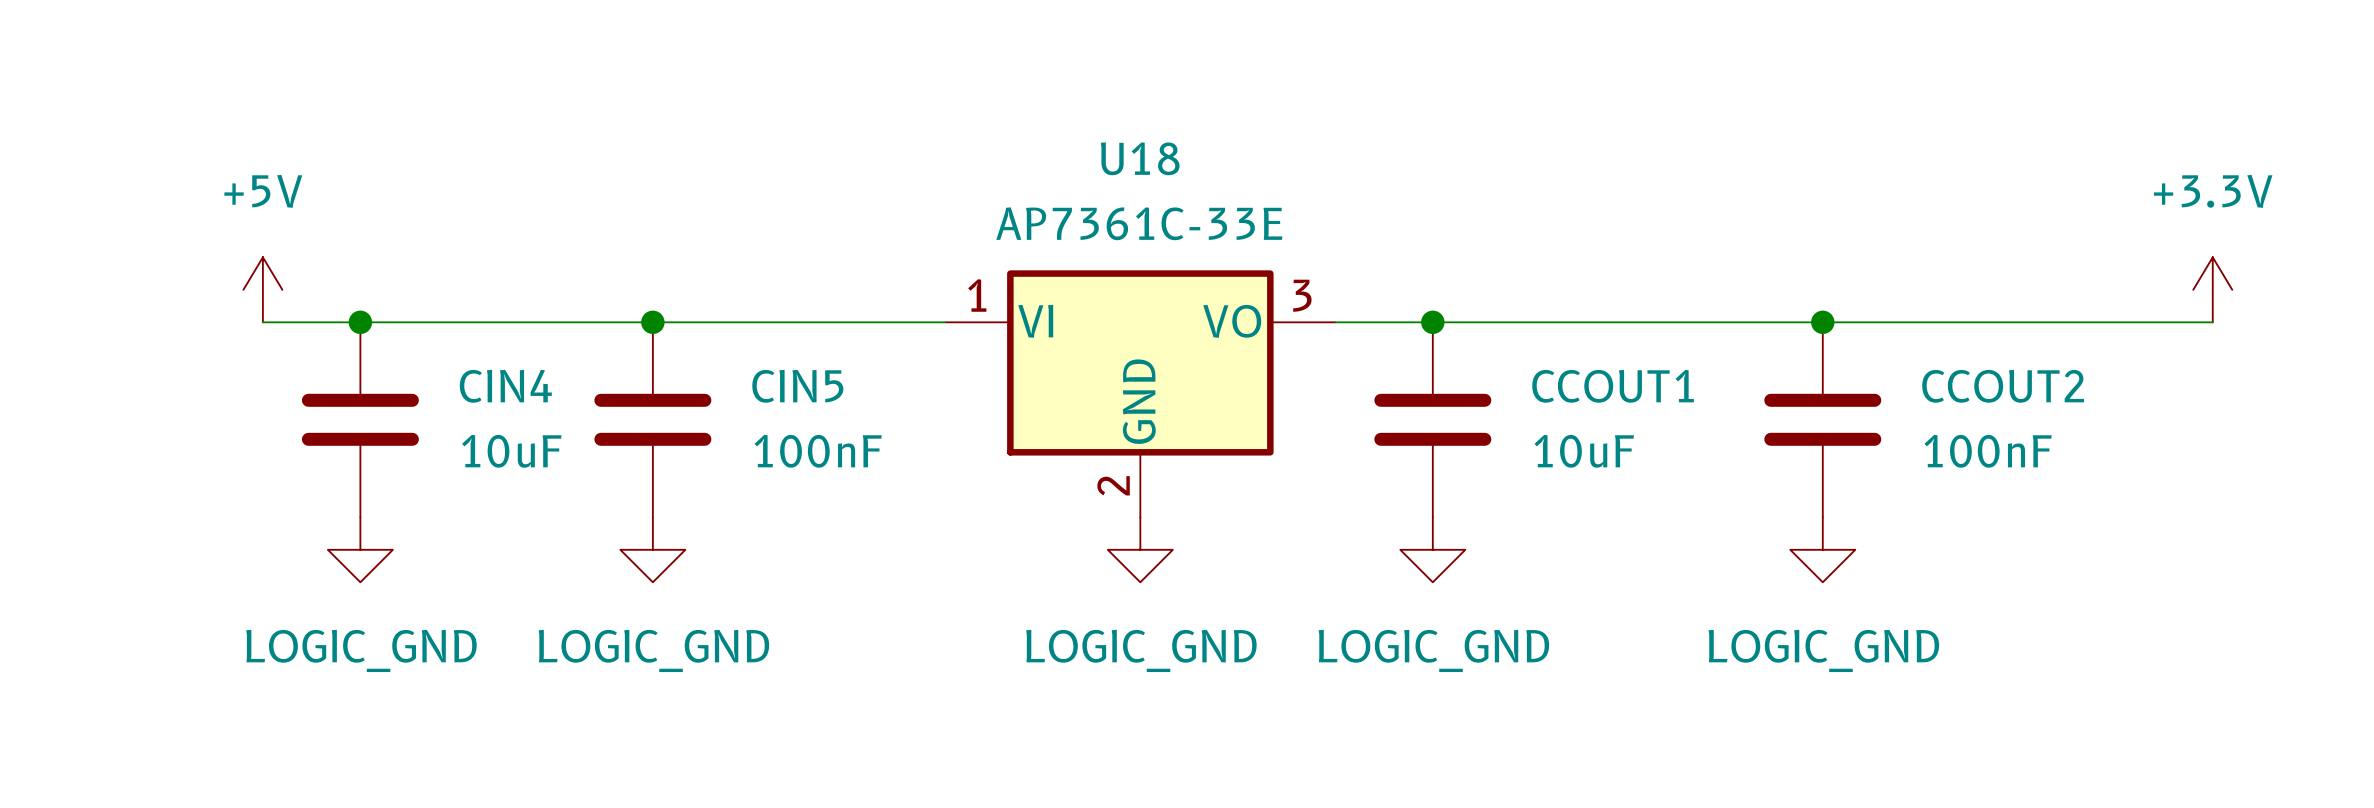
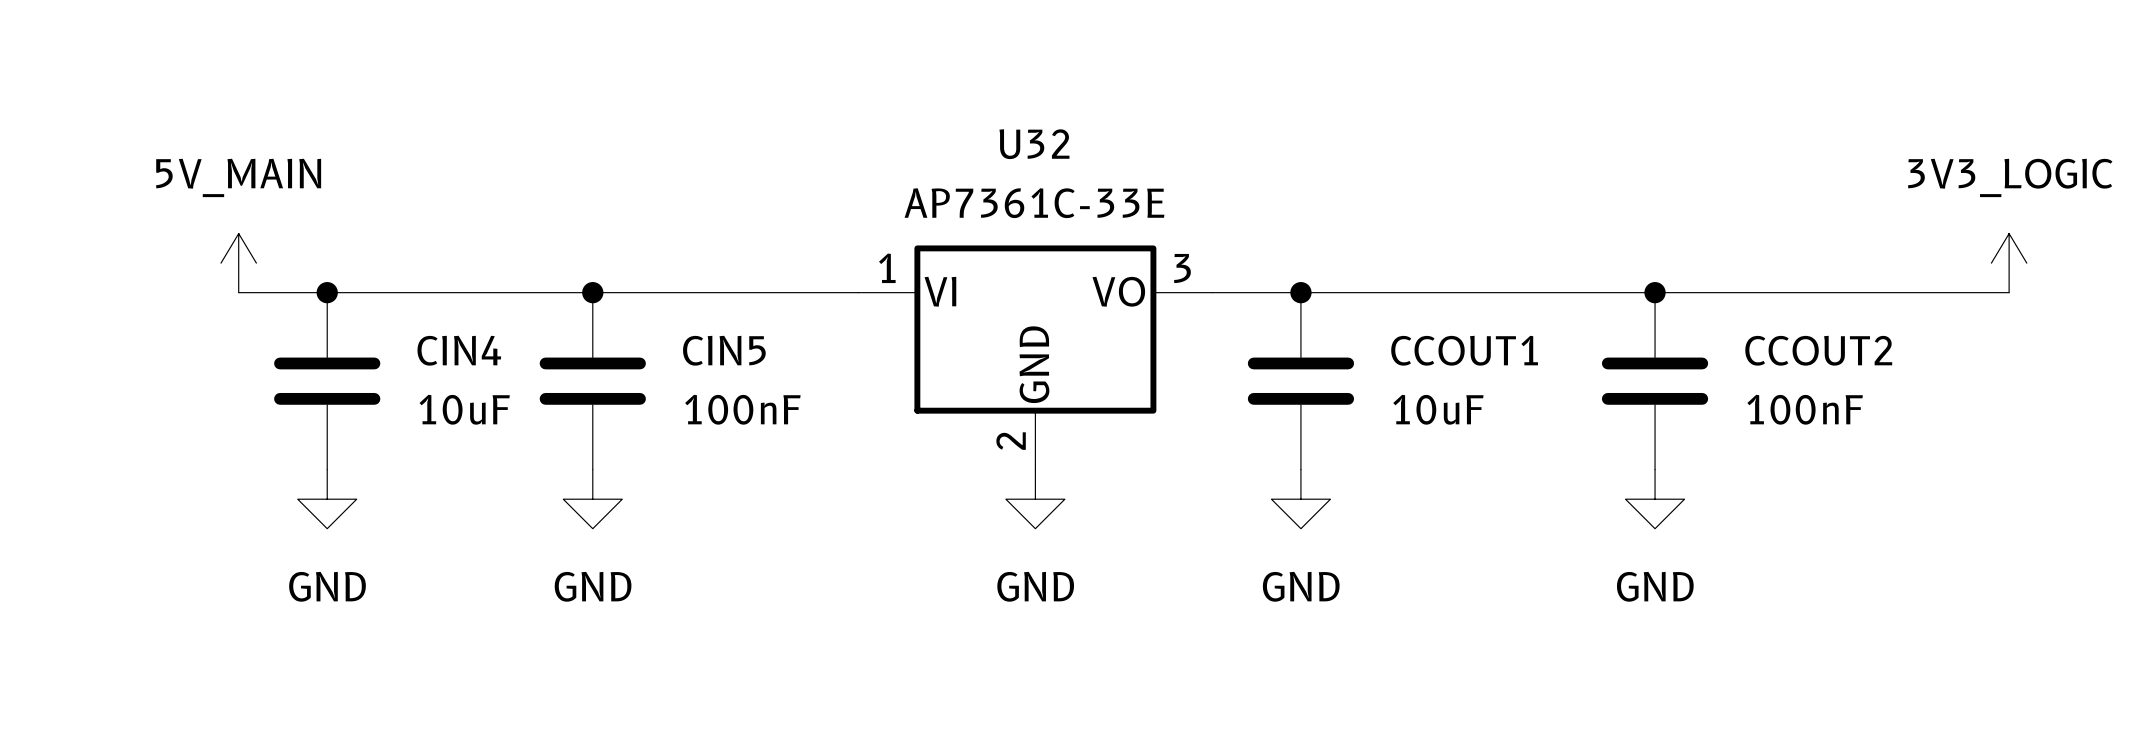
U18 name: U18 (1140, 158) -> U32 (1034, 144)
power symbol: +5V (262, 289) -> 5V_MAIN (238, 263)
power symbol: +3.3V (2212, 289) -> 3V3_LOGIC (2009, 263)
power symbol: LOGIC_GND (360, 549) -> GND (327, 499)
power symbol: LOGIC_GND (652, 549) -> GND (592, 499)
power symbol: LOGIC_GND (1140, 549) -> GND (1035, 499)
power symbol: LOGIC_GND (1432, 549) -> GND (1300, 499)
power symbol: LOGIC_GND (1822, 549) -> GND (1655, 499)

